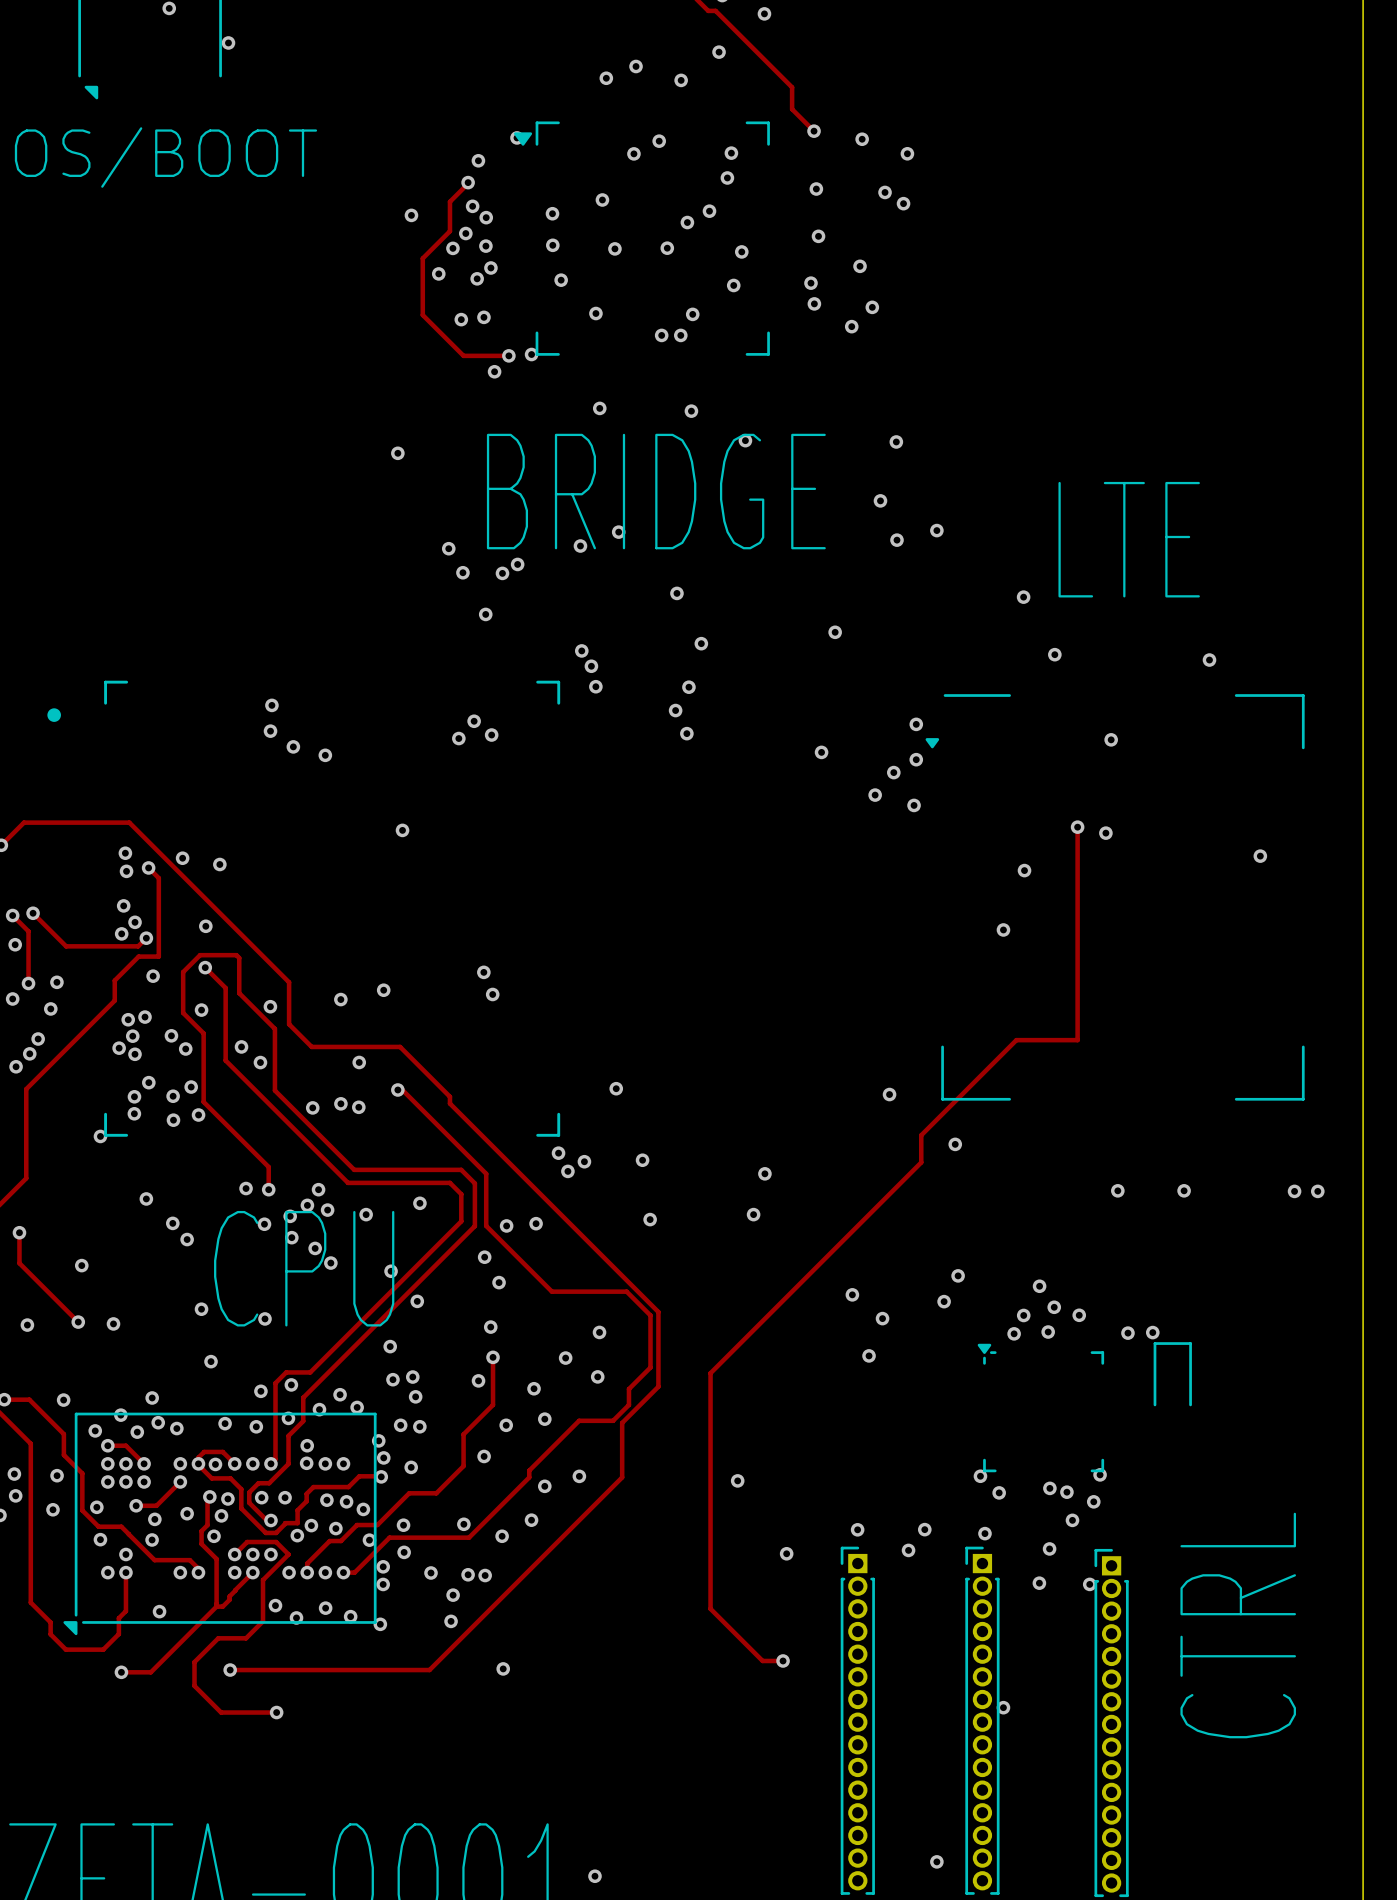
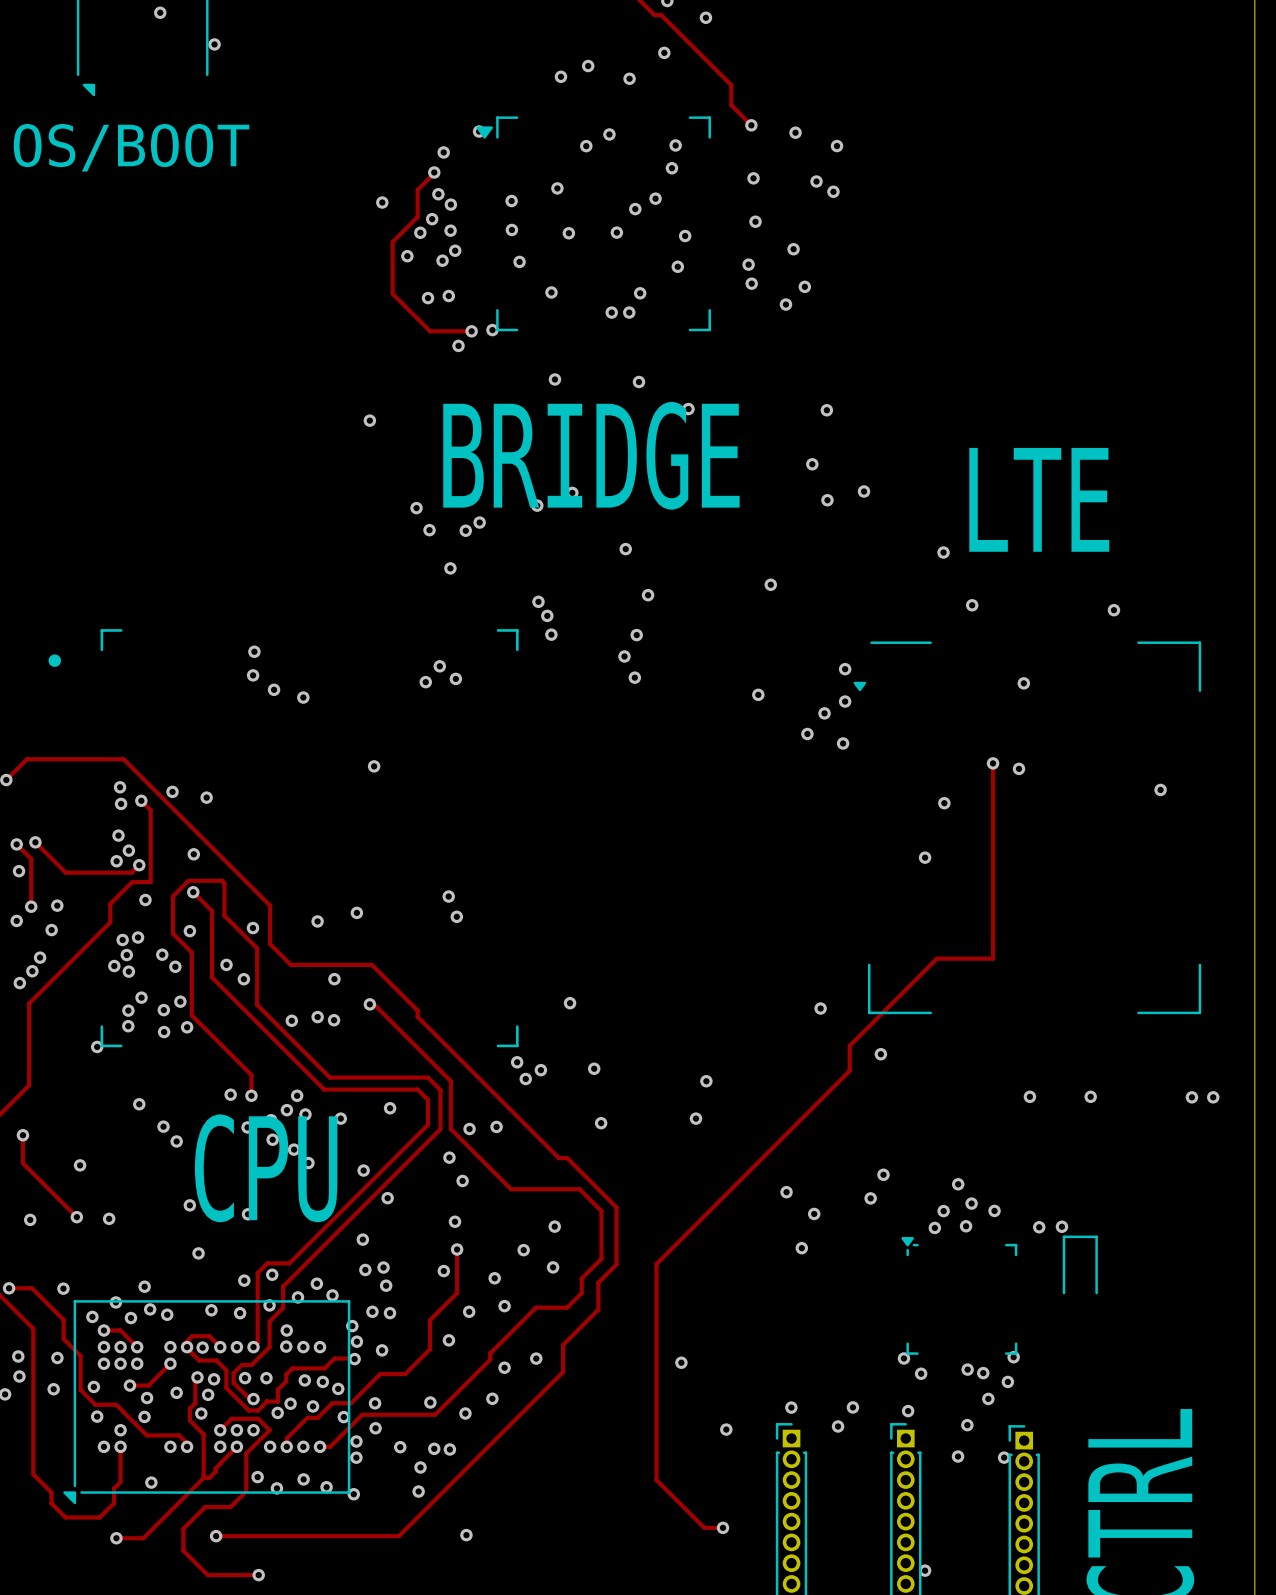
track: (604, 1257) (658, 1312) (658, 1386) (622, 1422) (622, 1477) (608, 1491) -> (558, 1158) (567, 1158) (616, 1207) (616, 1264) (598, 1282) (598, 1309) (563, 1345) (563, 1372)

